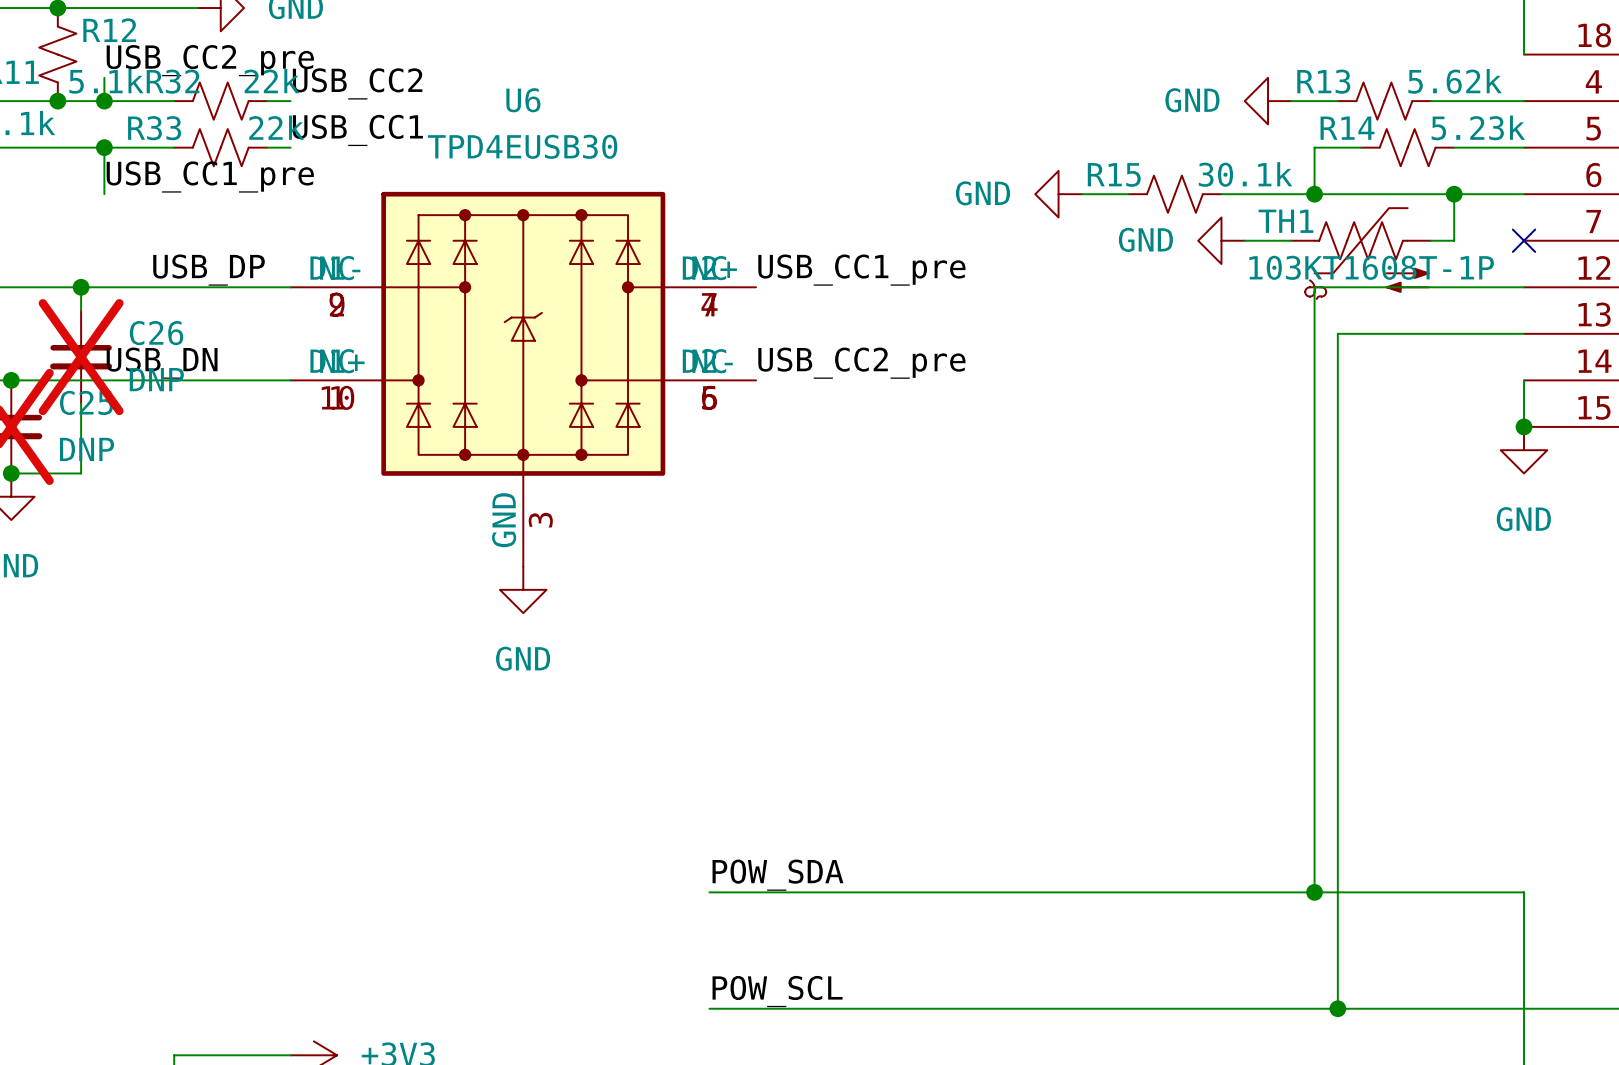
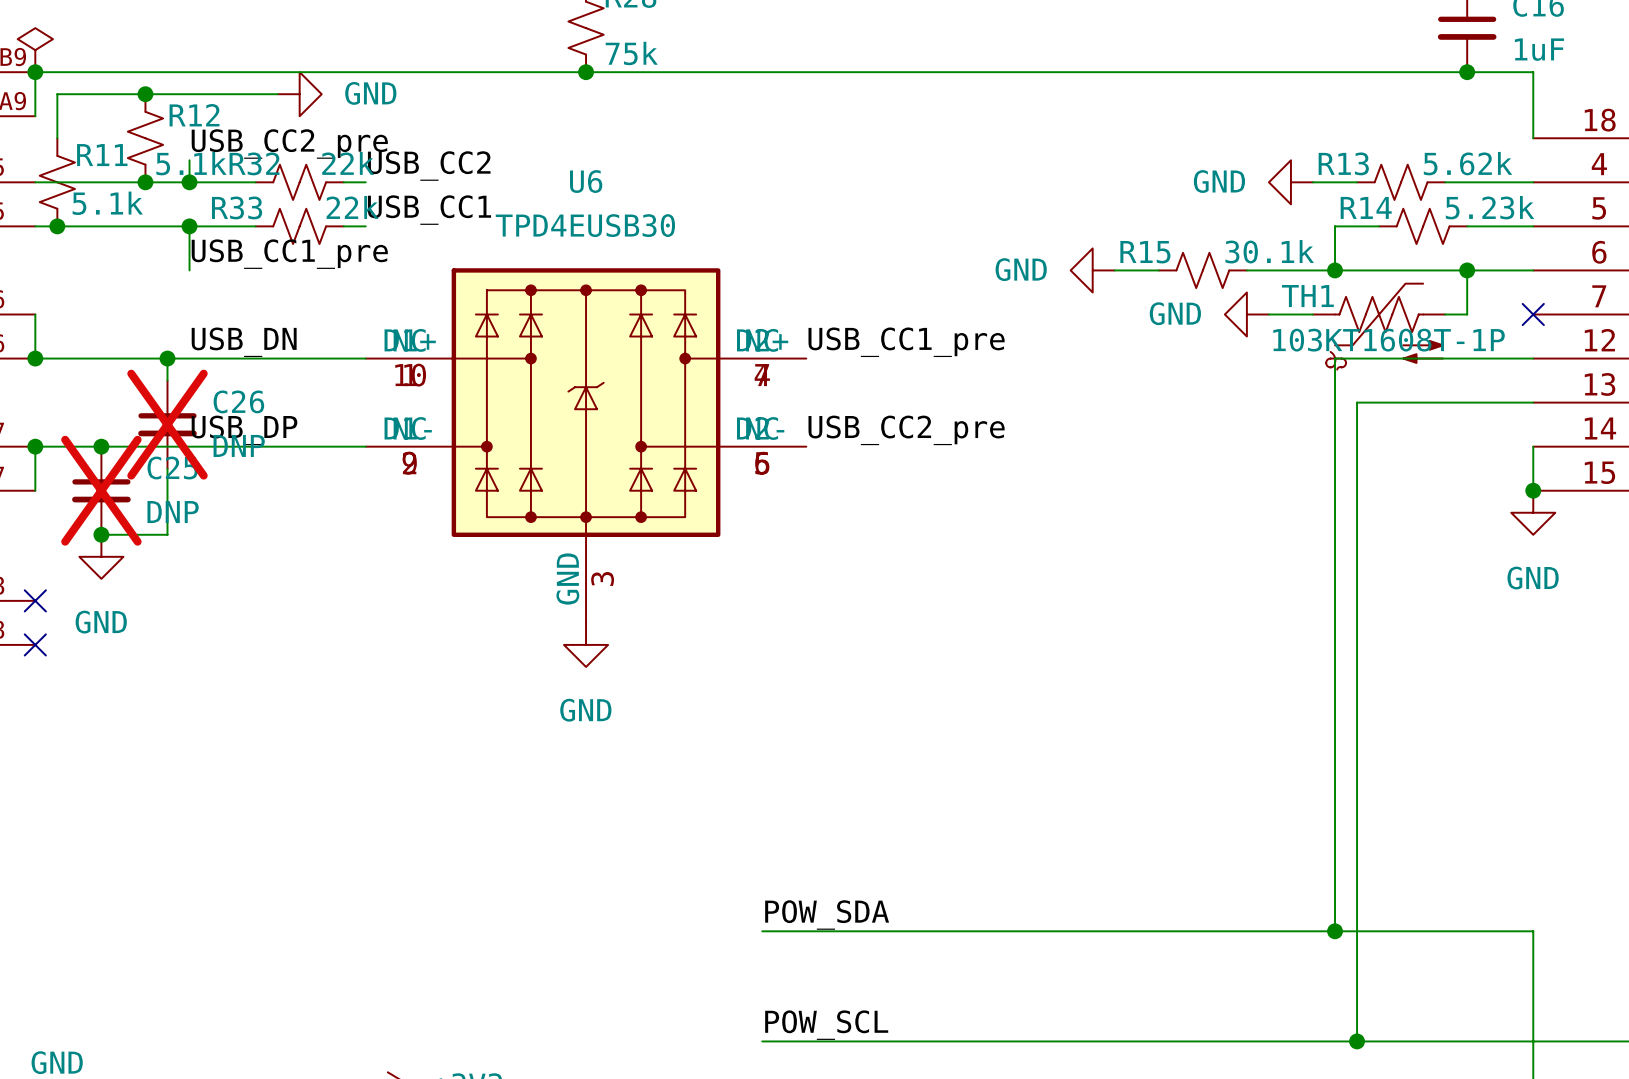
U6 symbol: [290, 191, 757, 567] -> [365, 268, 807, 623]
label: USB_DP (209, 270) -> USB_DN (244, 342)
label: USB_DN (162, 363) -> USB_DP (244, 430)

